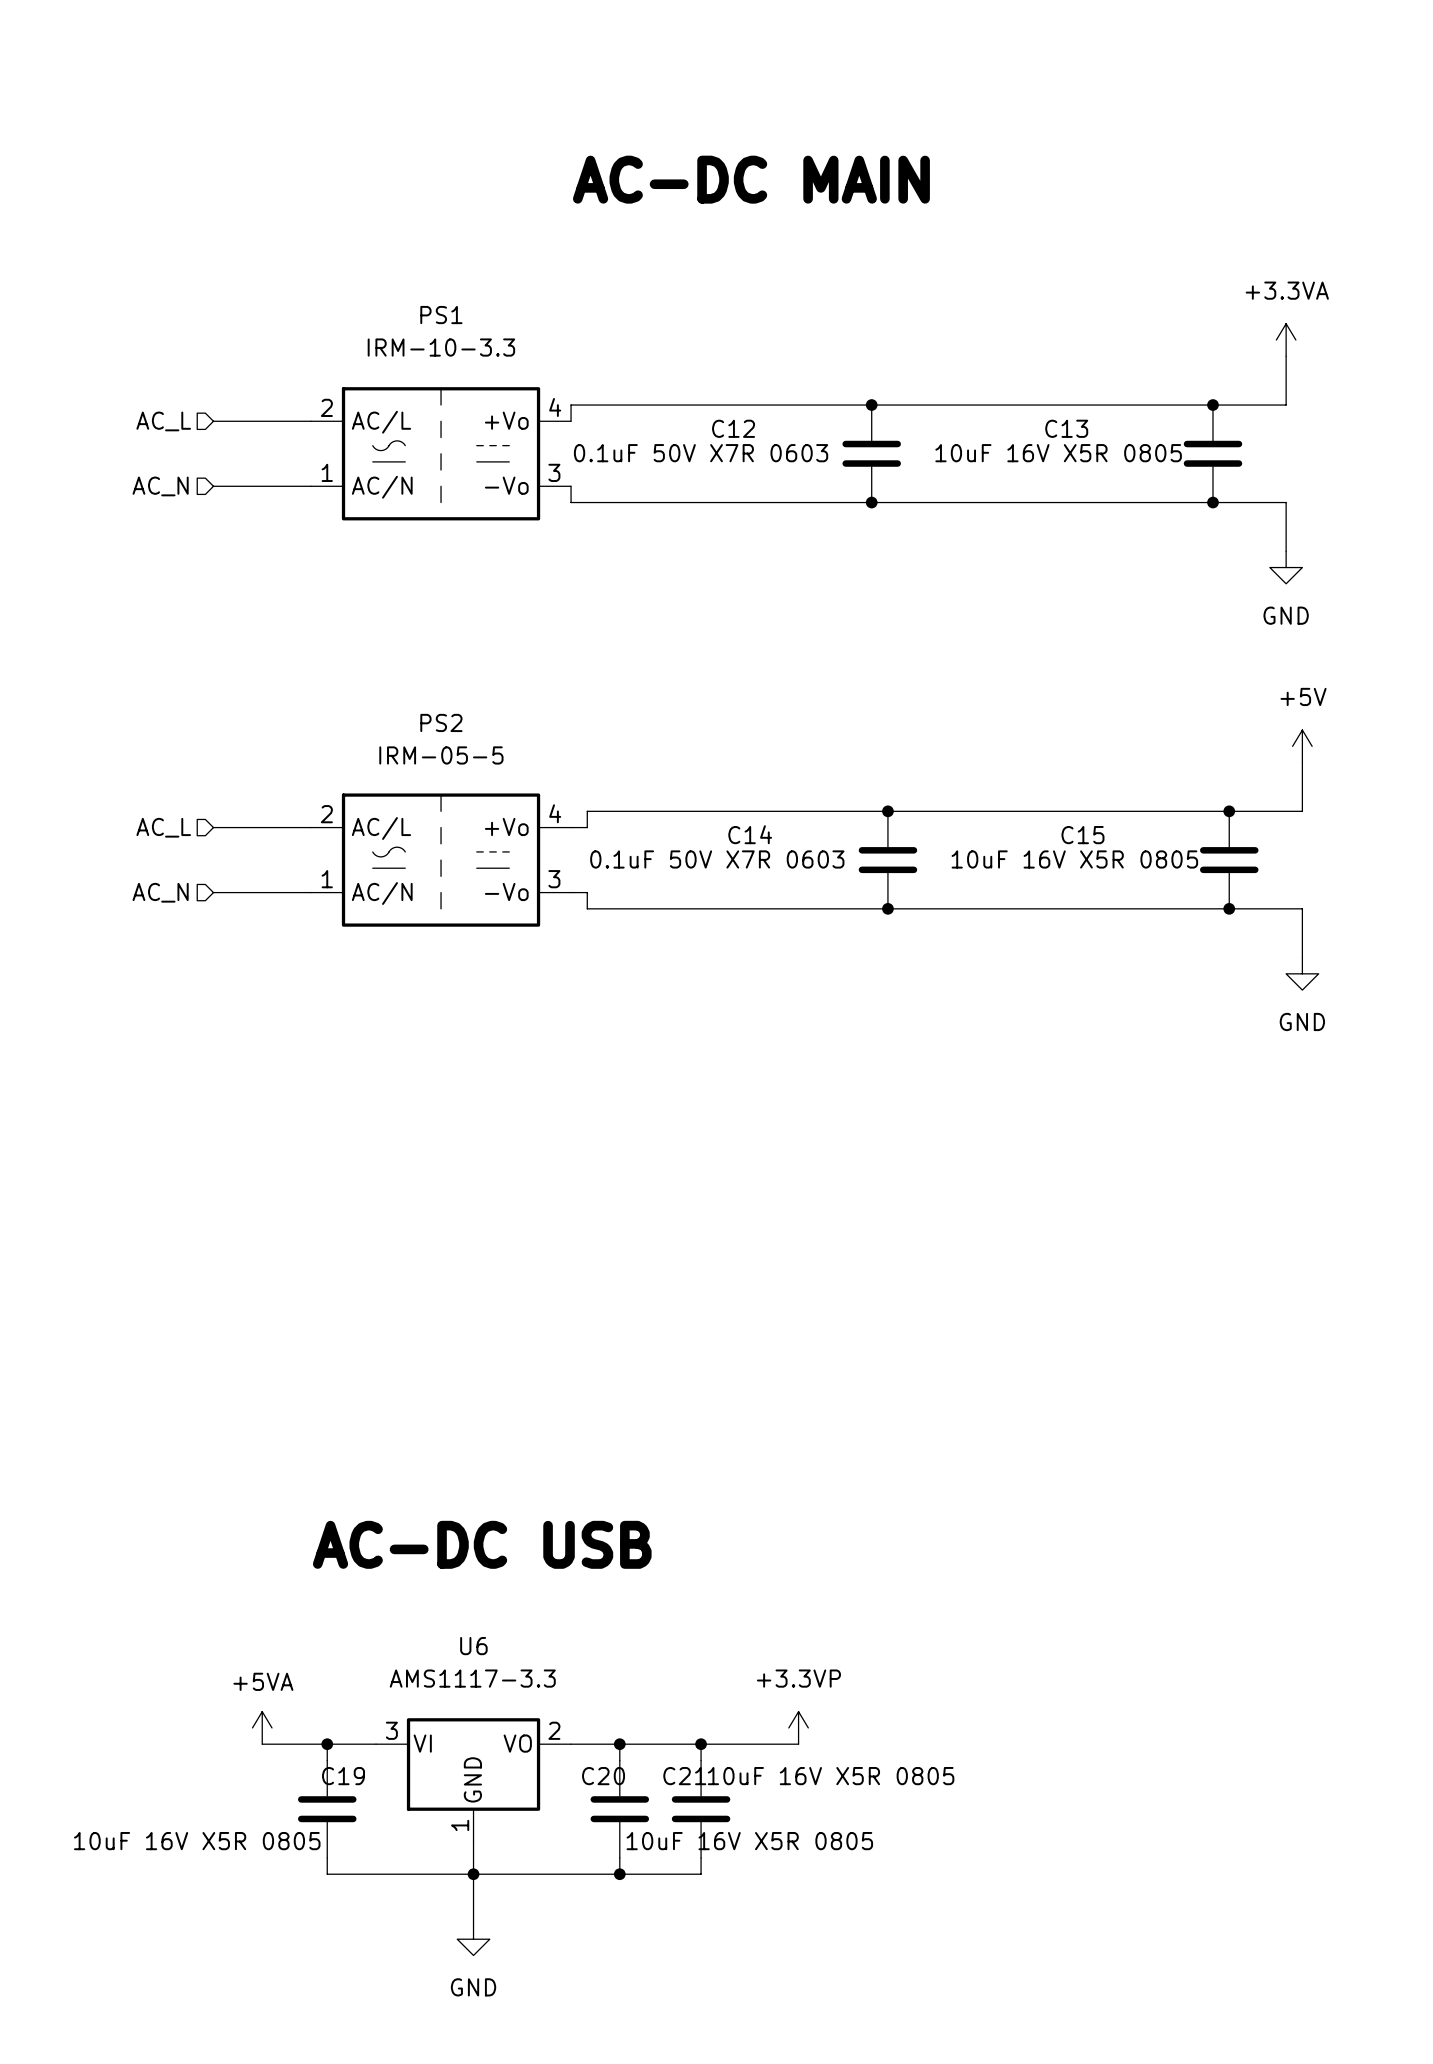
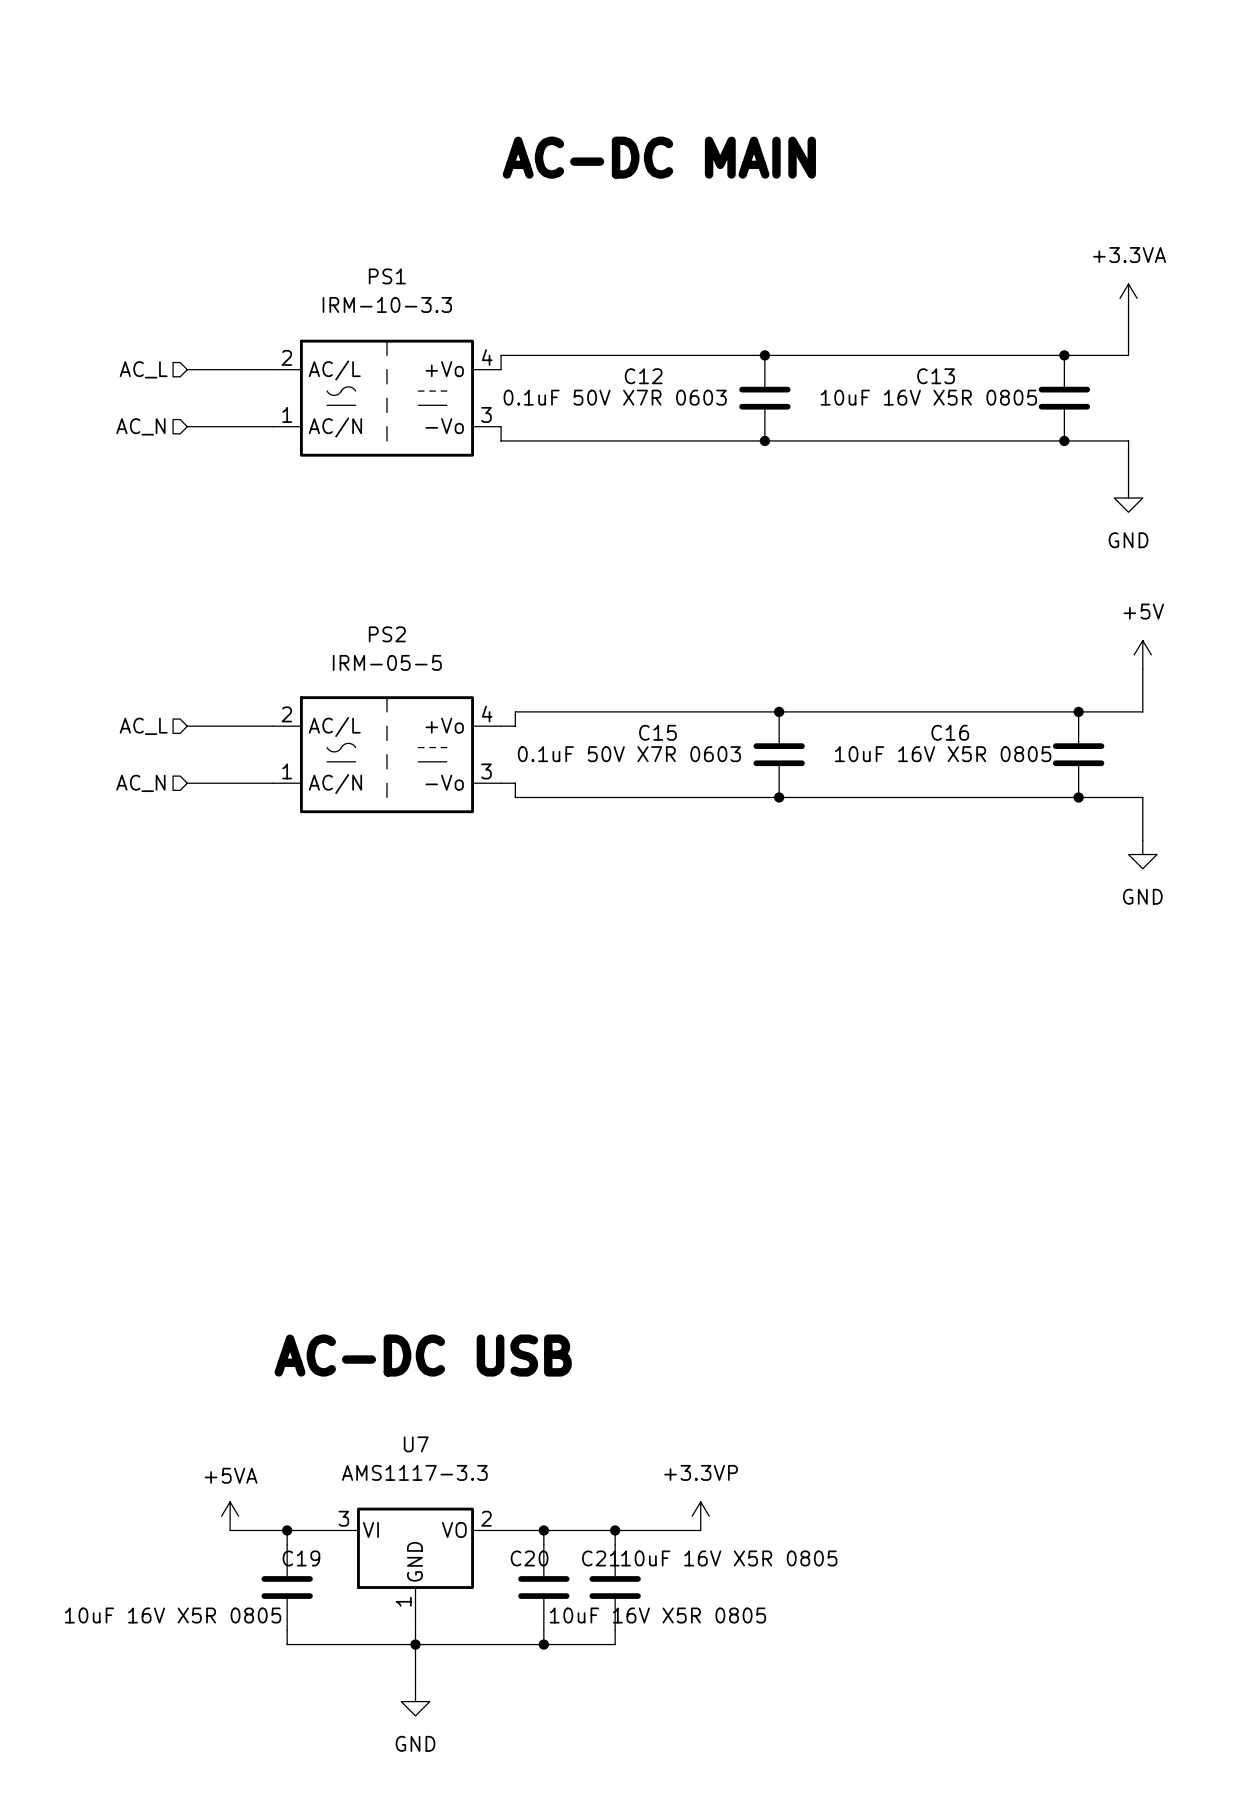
C14 name: C14 (750, 834) -> C15 (657, 732)
C15 name: C15 (1082, 835) -> C16 (950, 732)
U6 name: U6 (473, 1646) -> U7 (416, 1444)

